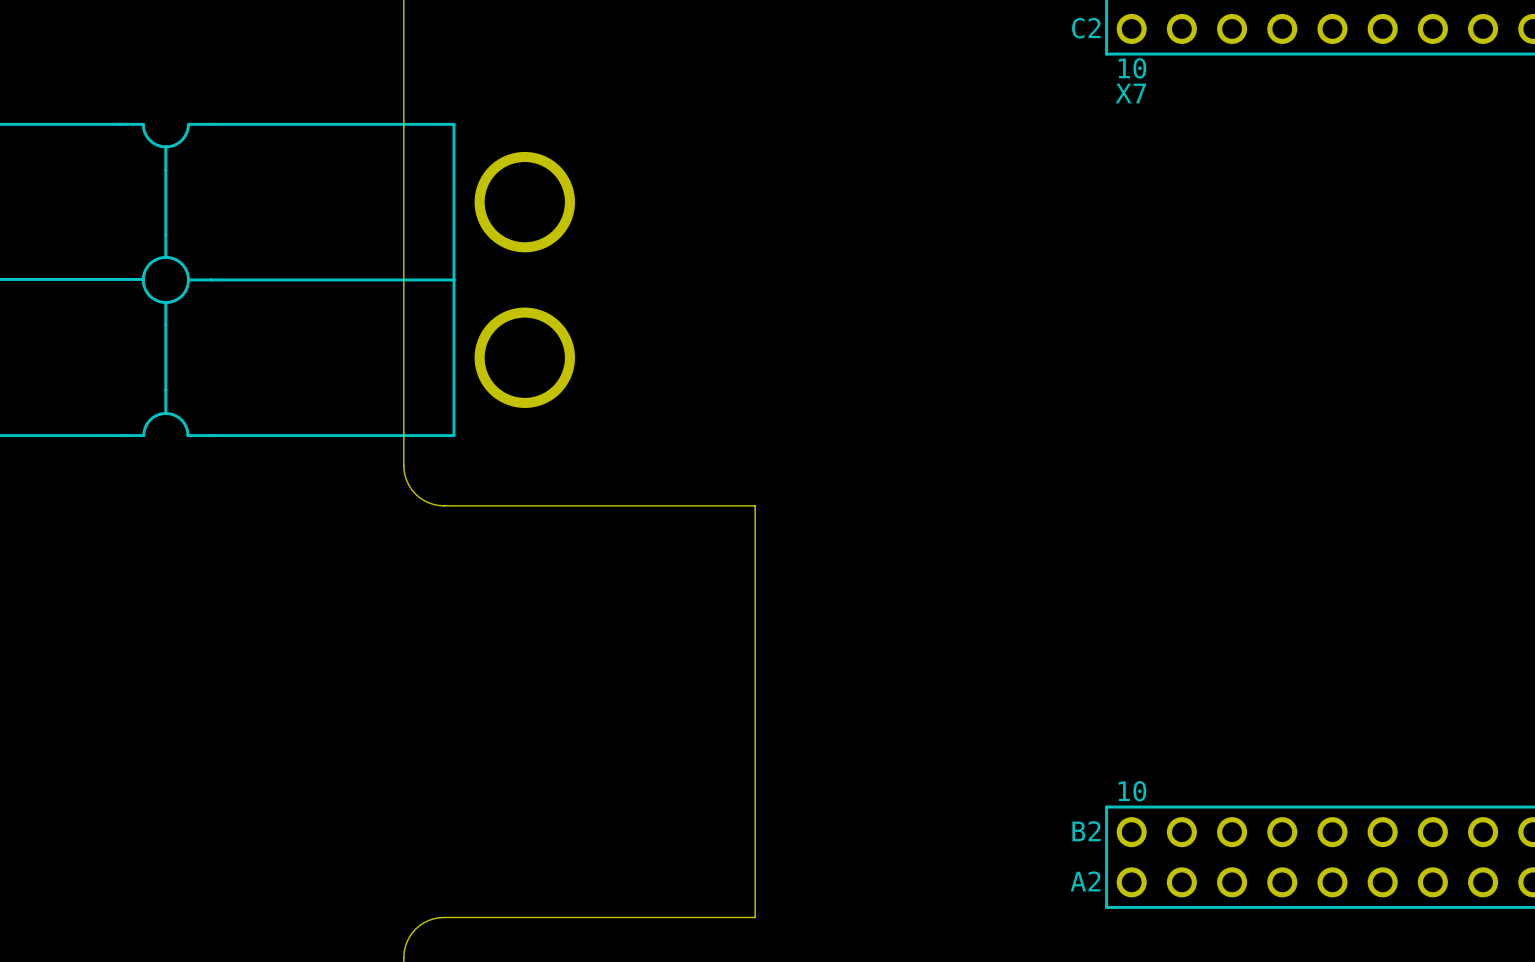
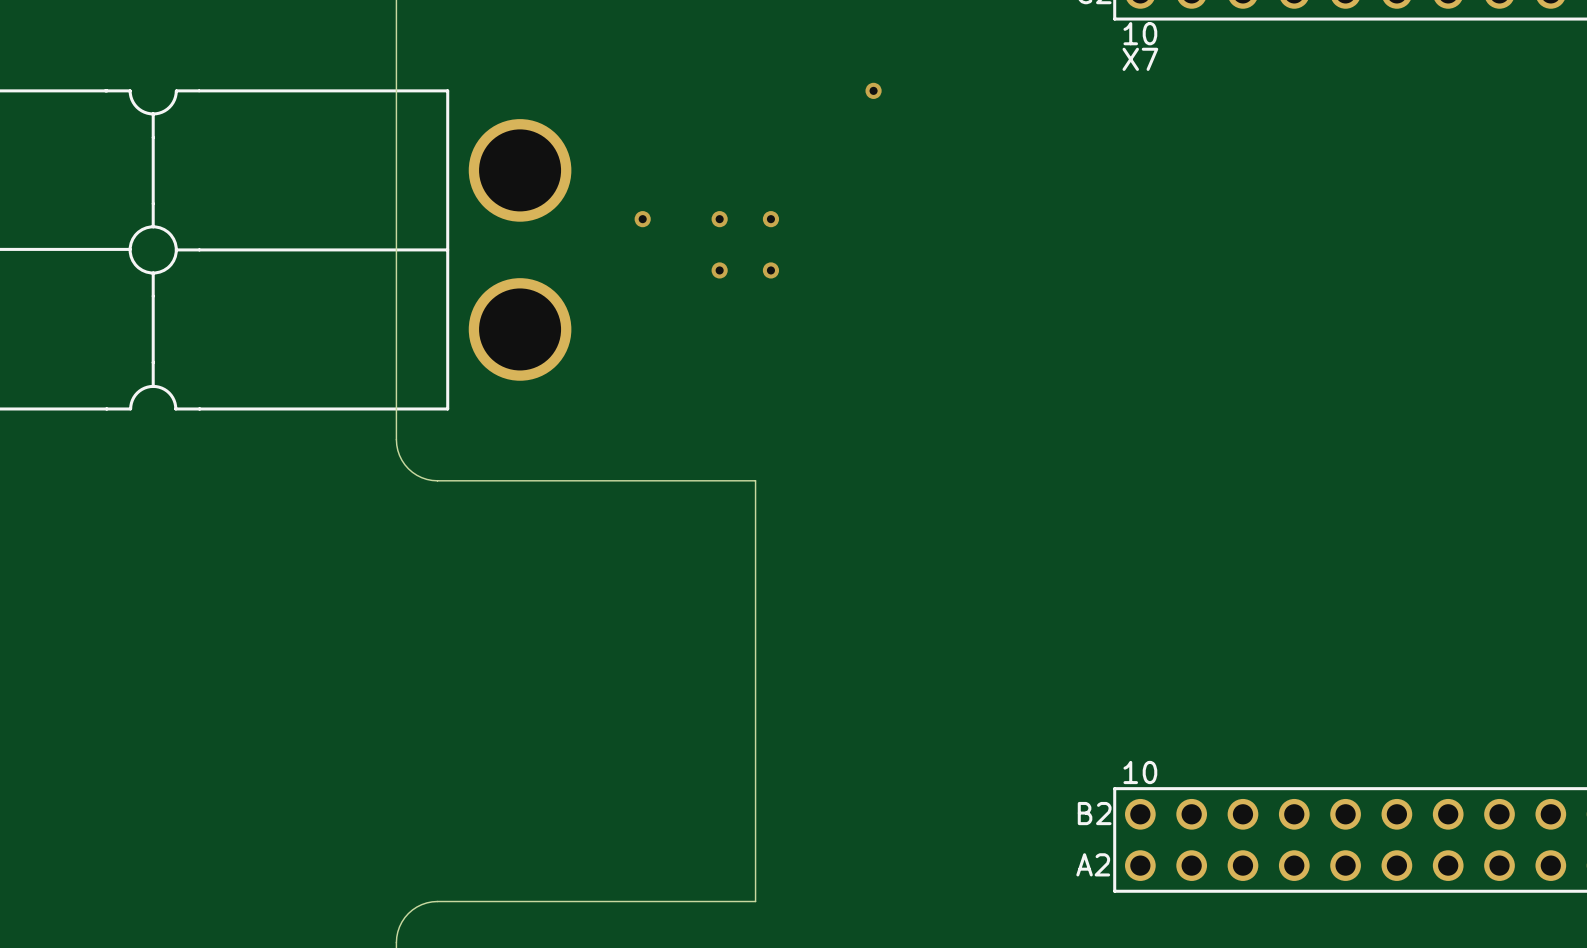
via: none -> (873, 90)
via: none -> (642, 219)
via: none -> (719, 219)
via: none -> (770, 219)
via: none -> (719, 270)
via: none -> (770, 270)

